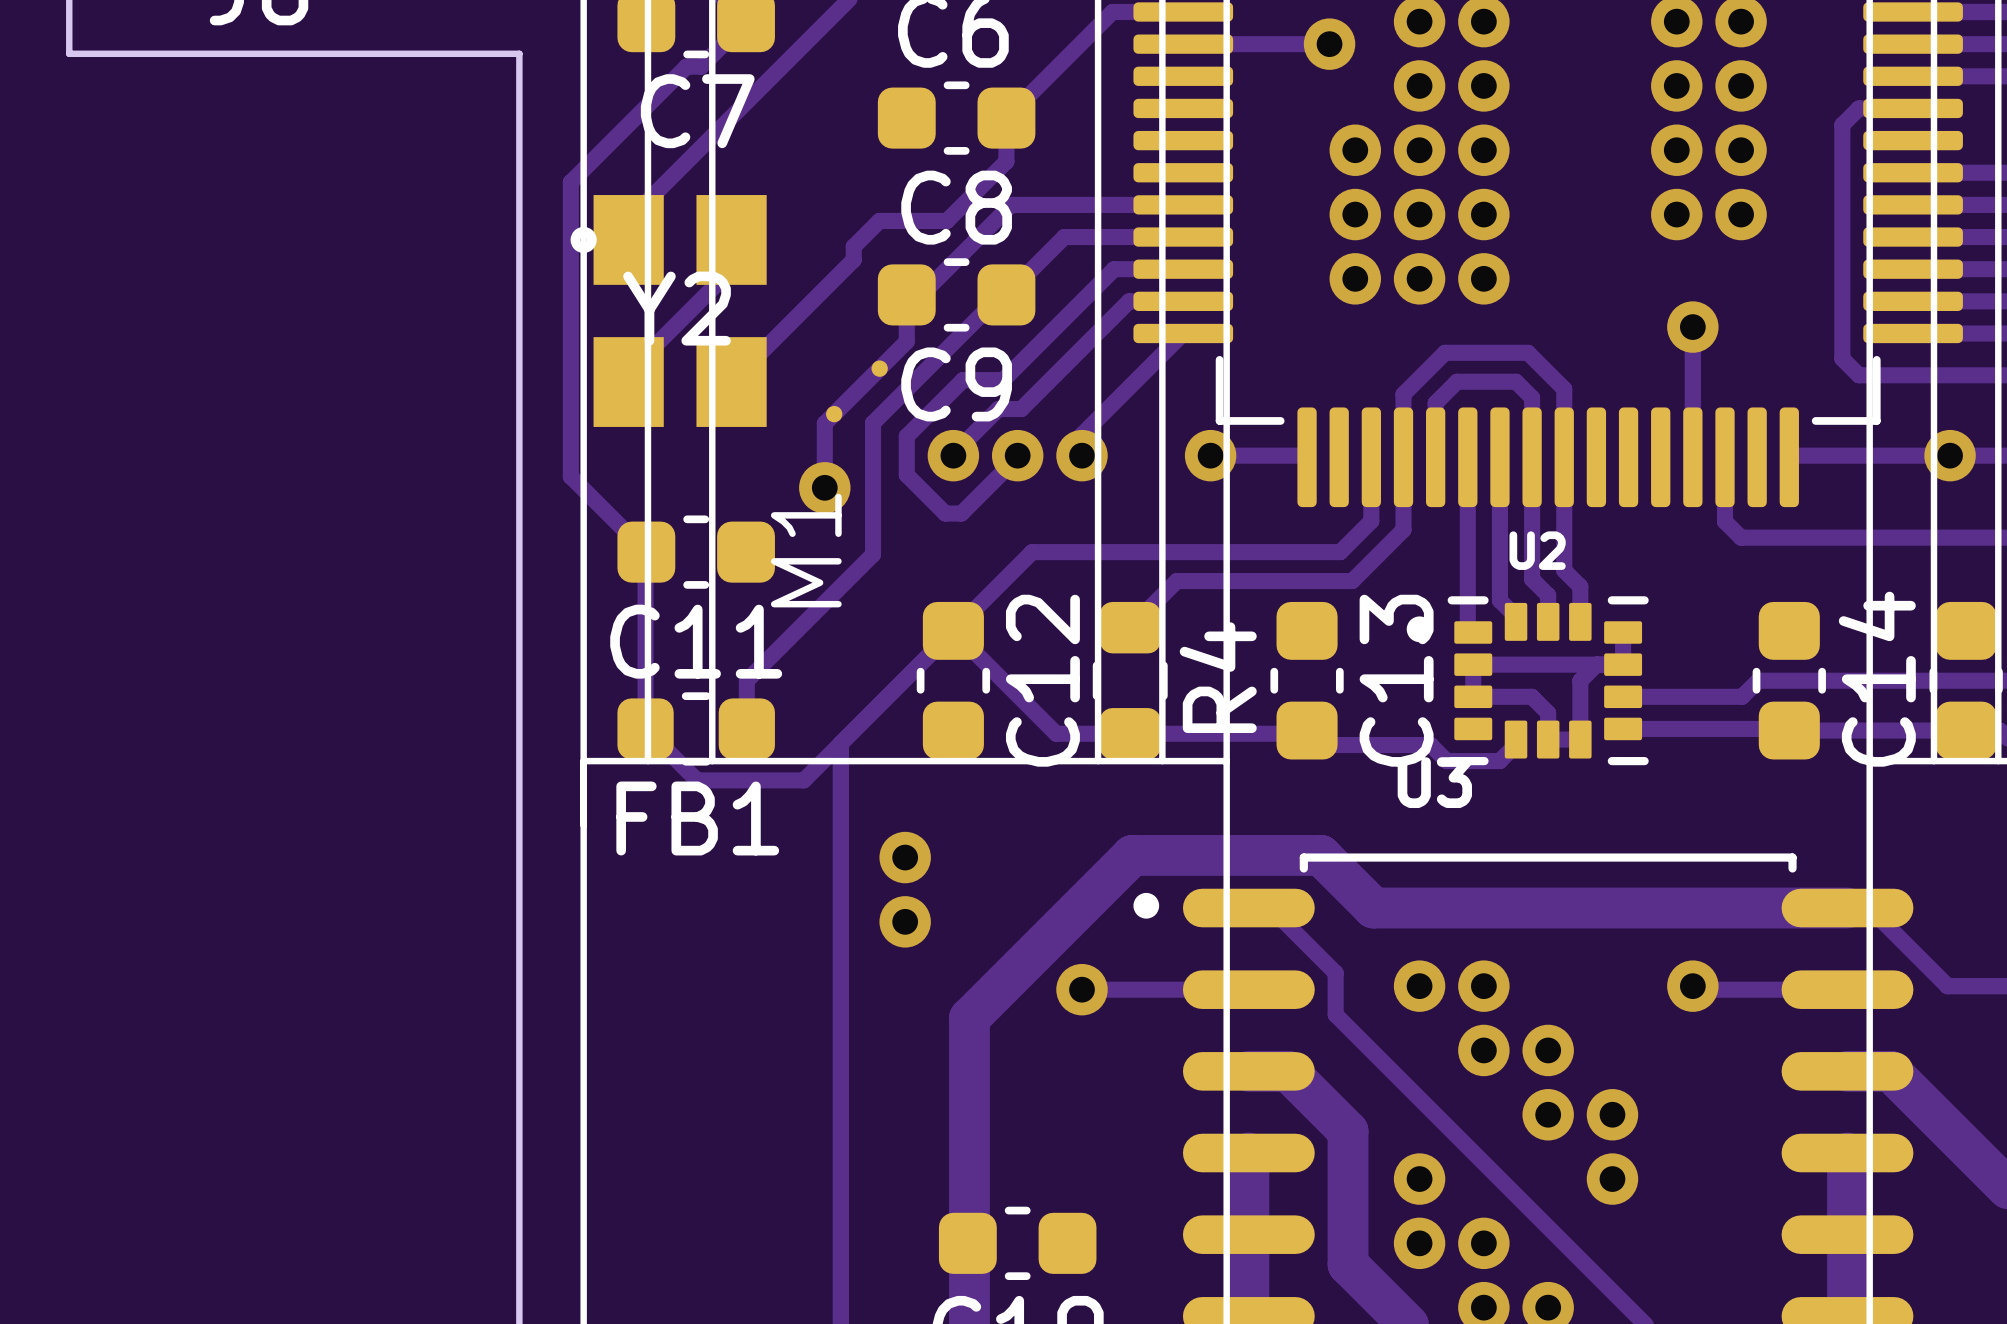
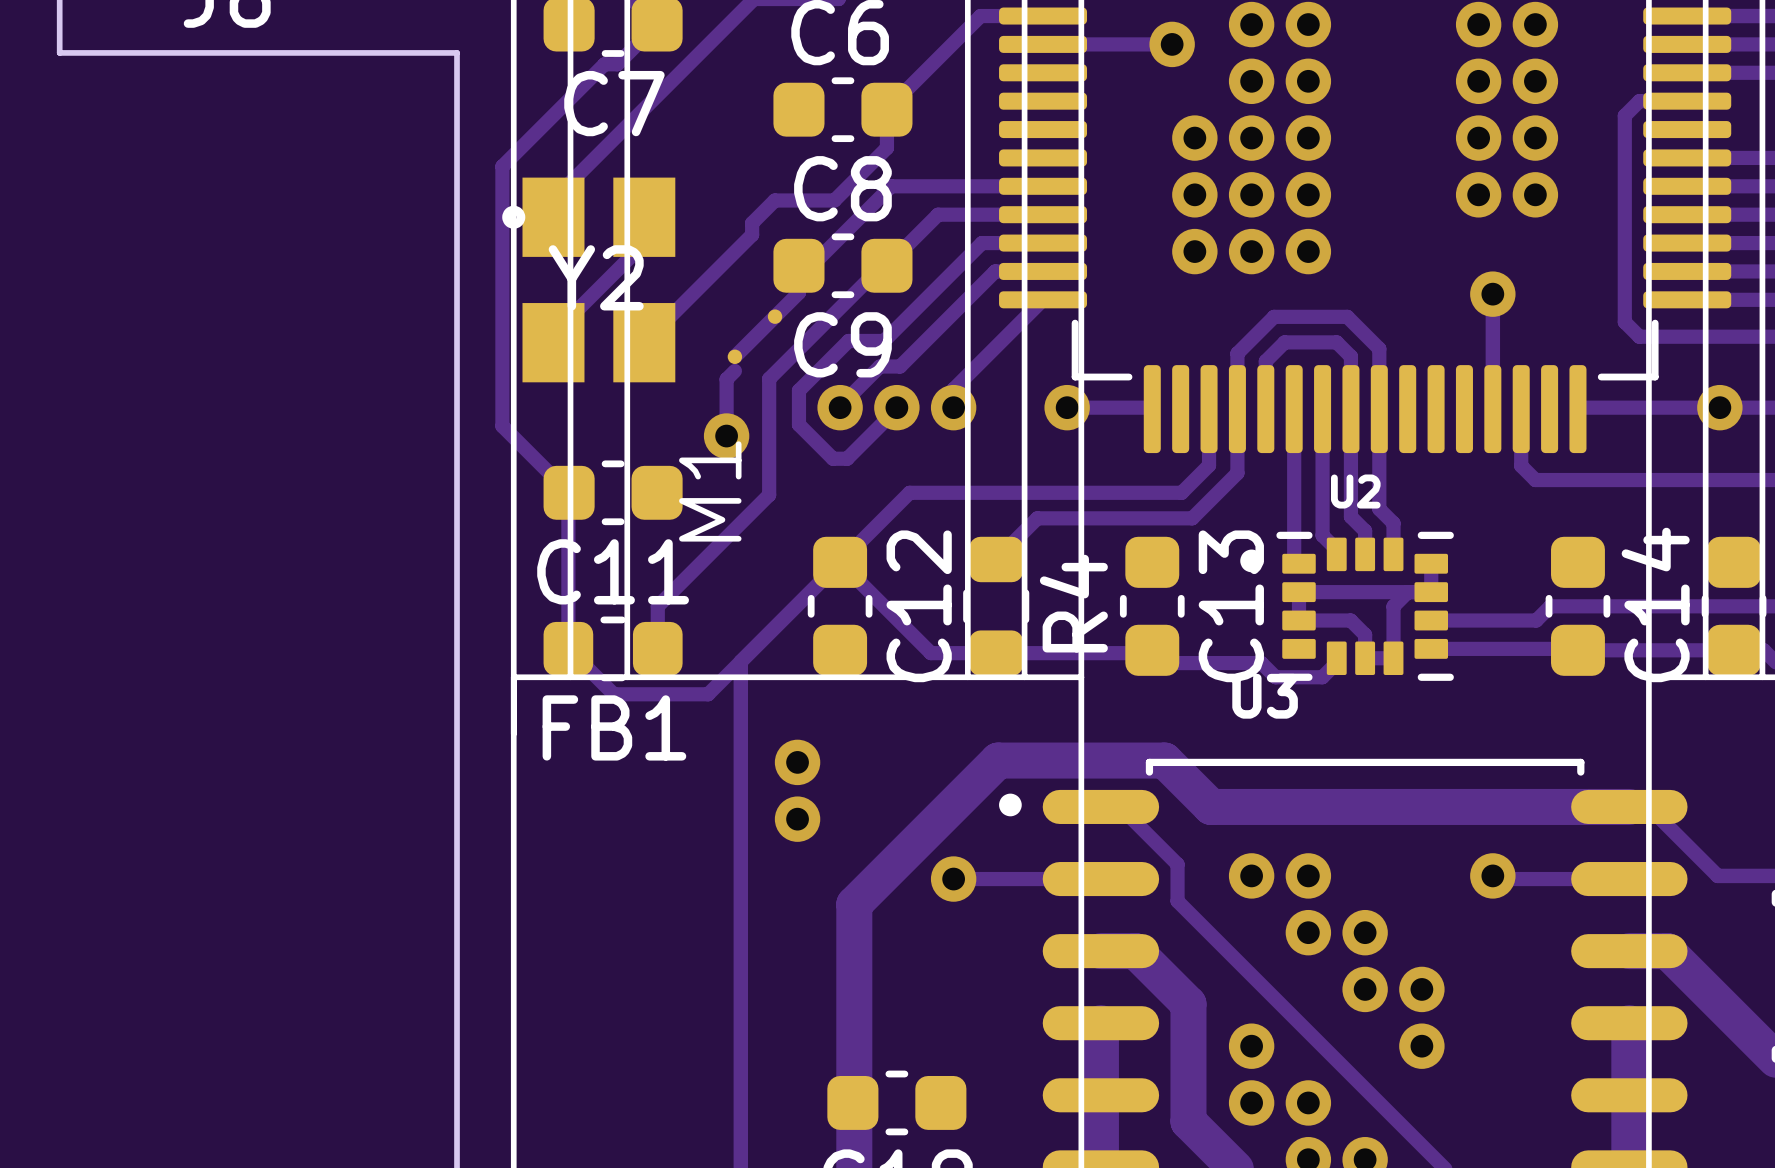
track: (906, 325) (906, 341) (879, 368) -> (798, 292) (775, 316)
part position: (856, 391) -> (754, 336)

